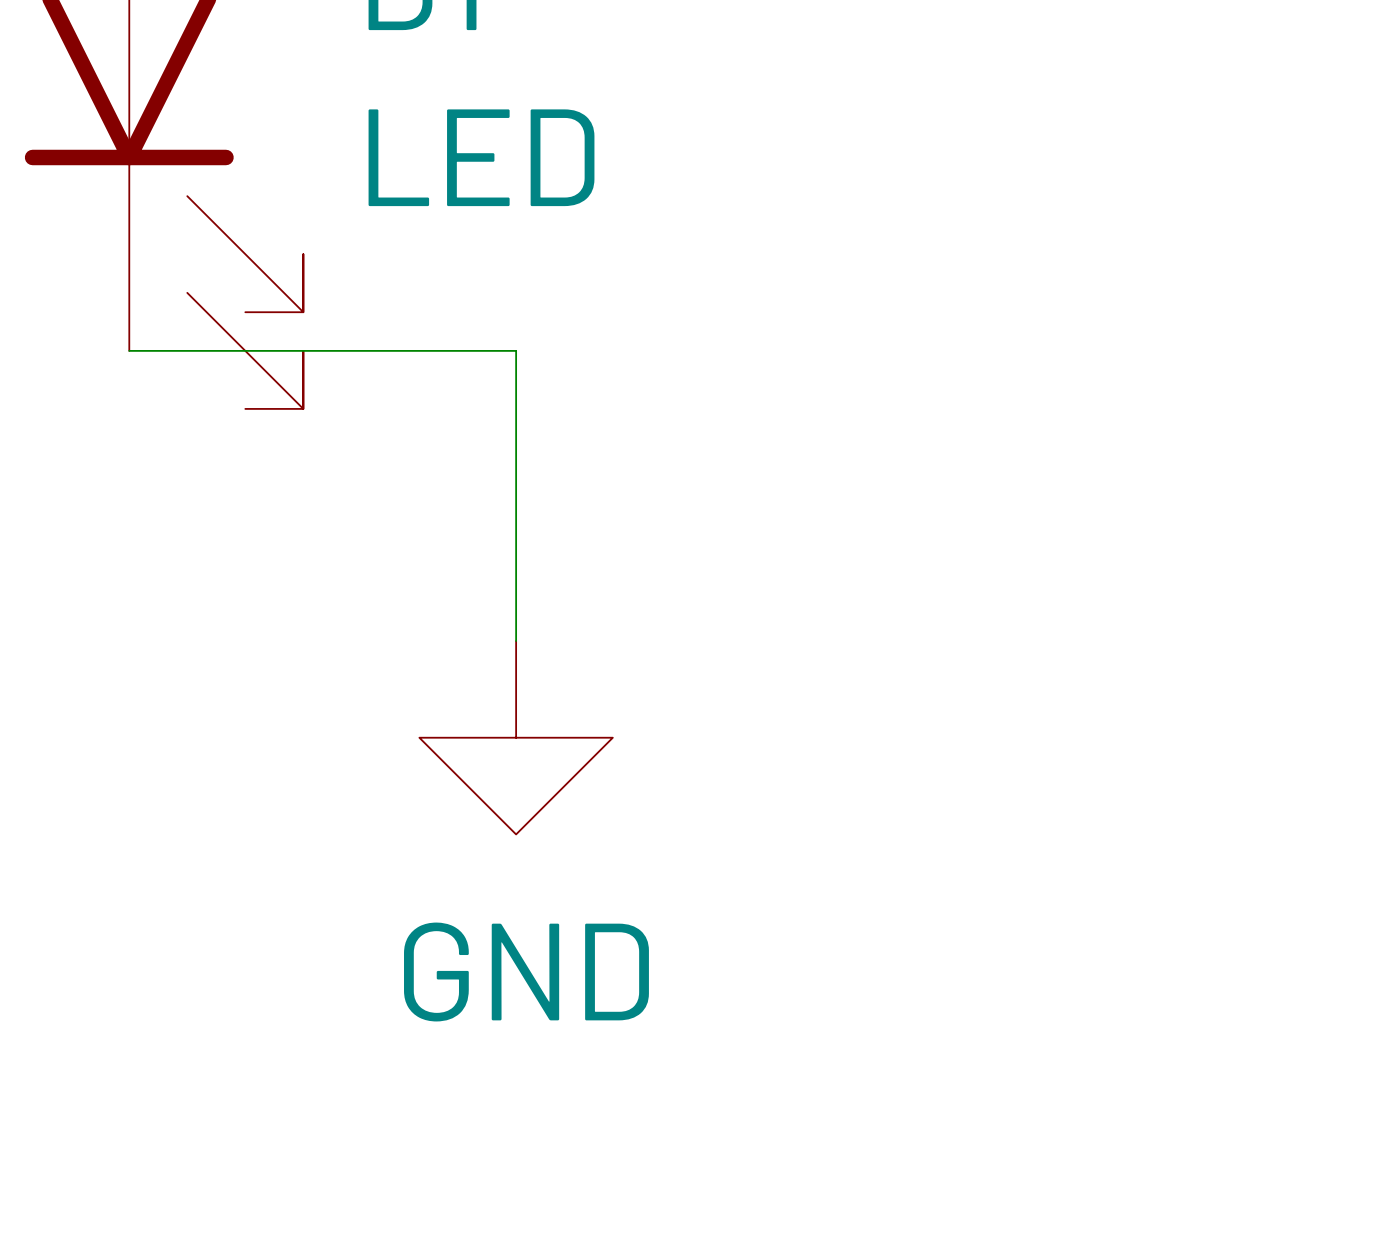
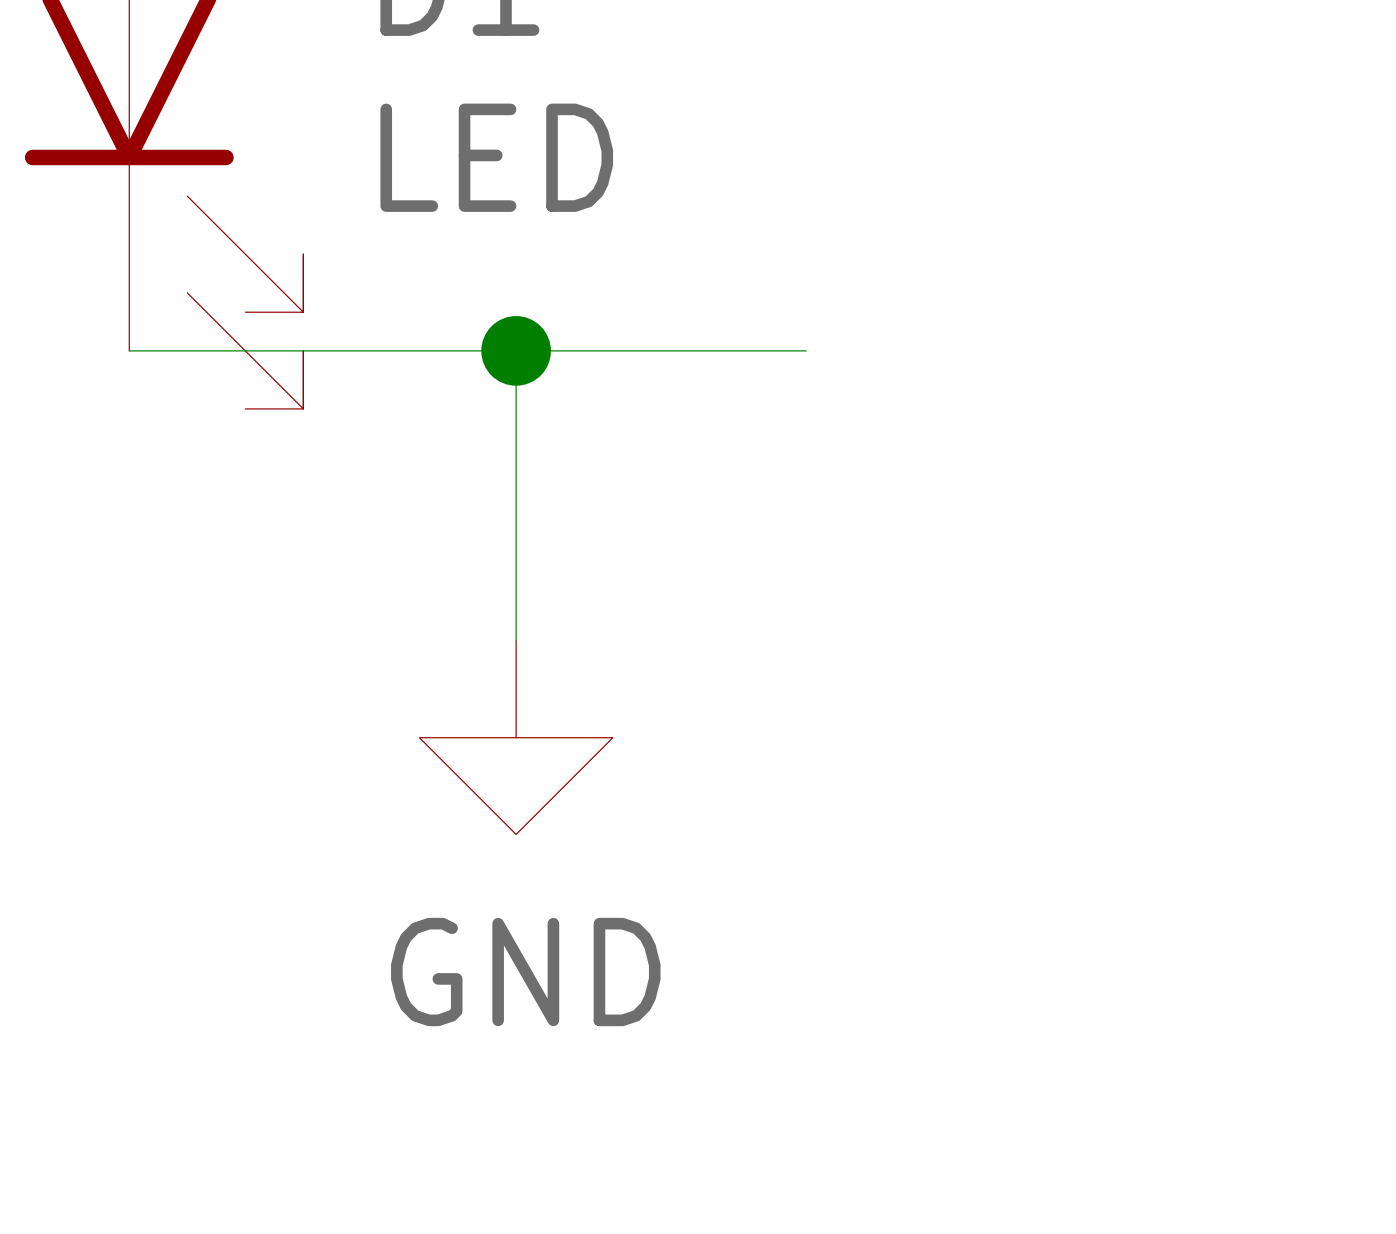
wire: none -> (516, 350) (806, 350)
junction: none -> (516, 350)

